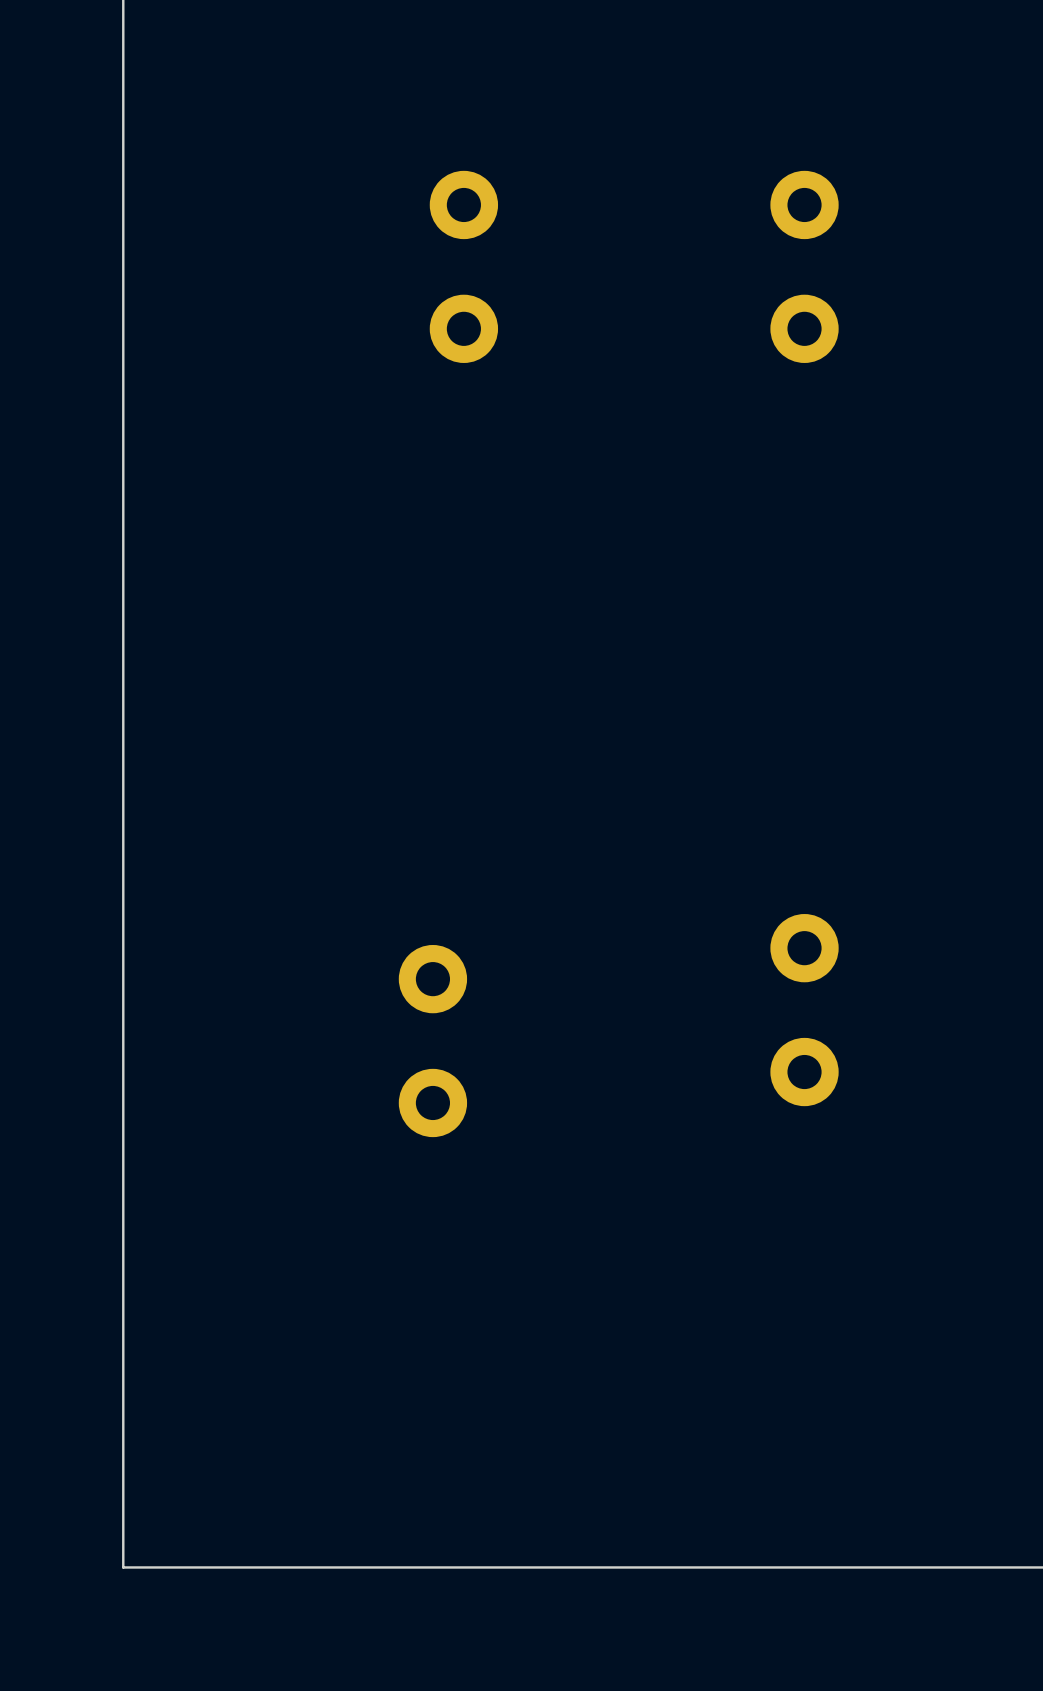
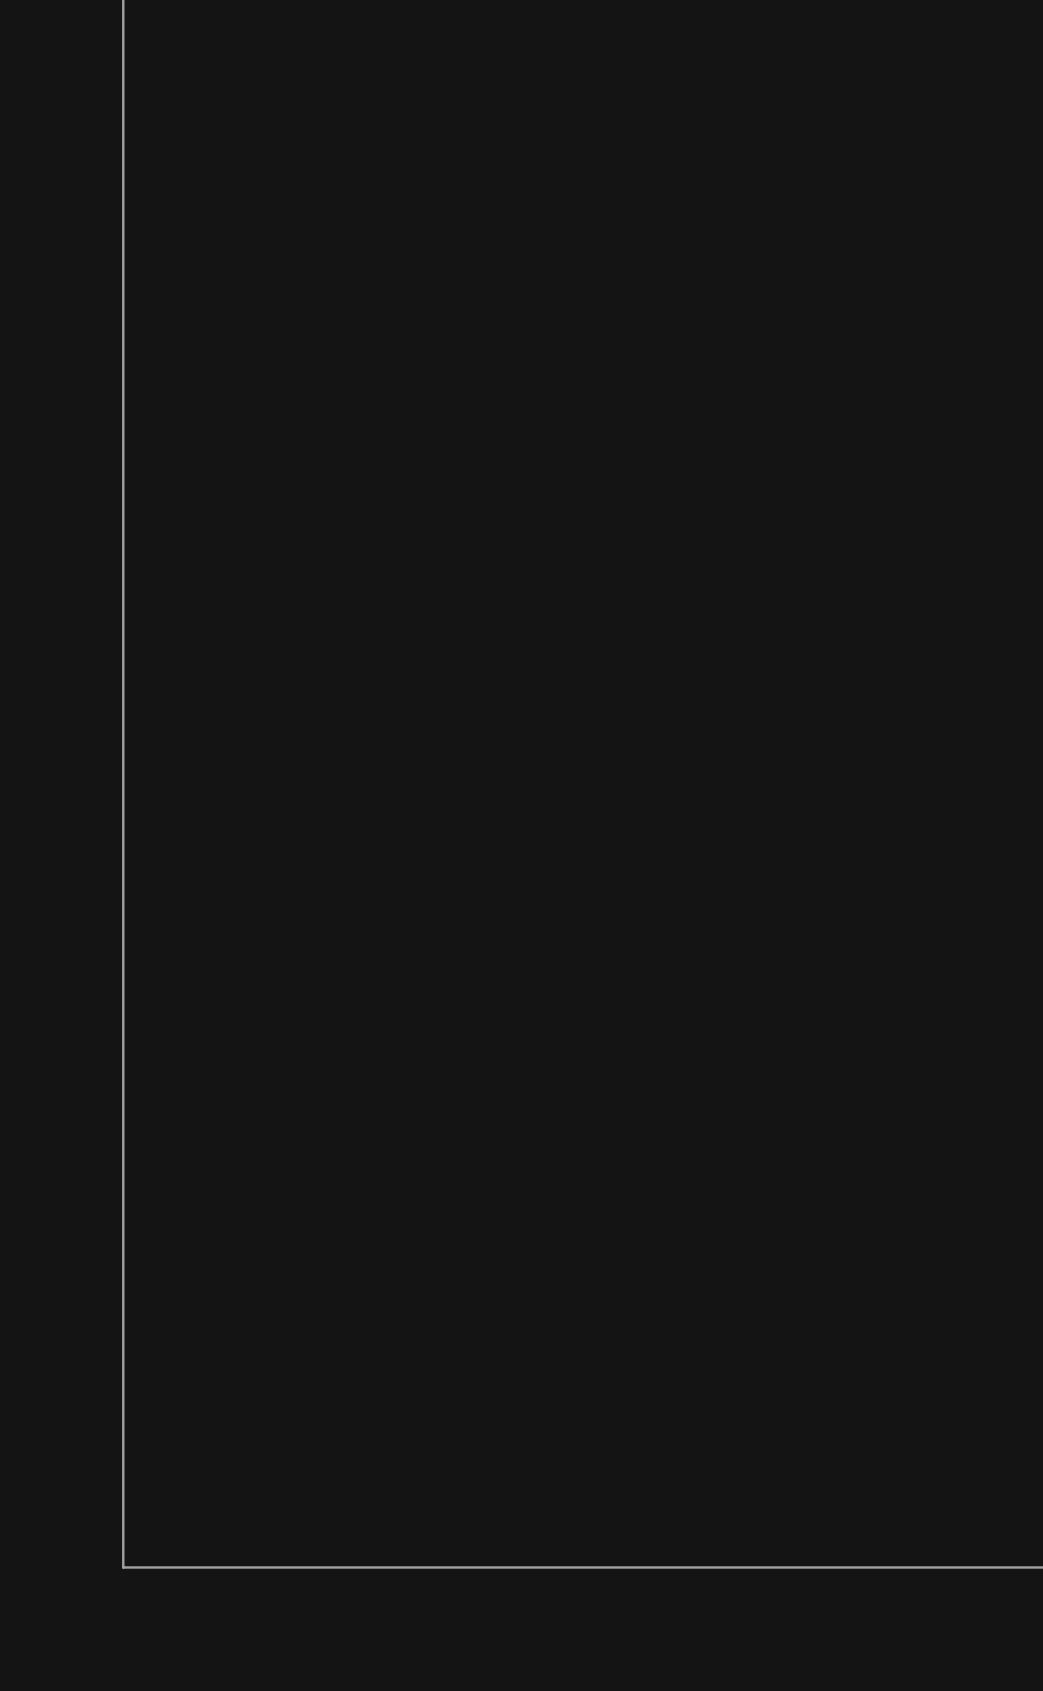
part: (463, 266) -> none
part: (804, 266) -> none
part: (804, 1010) -> none
part: (432, 1041) -> none

